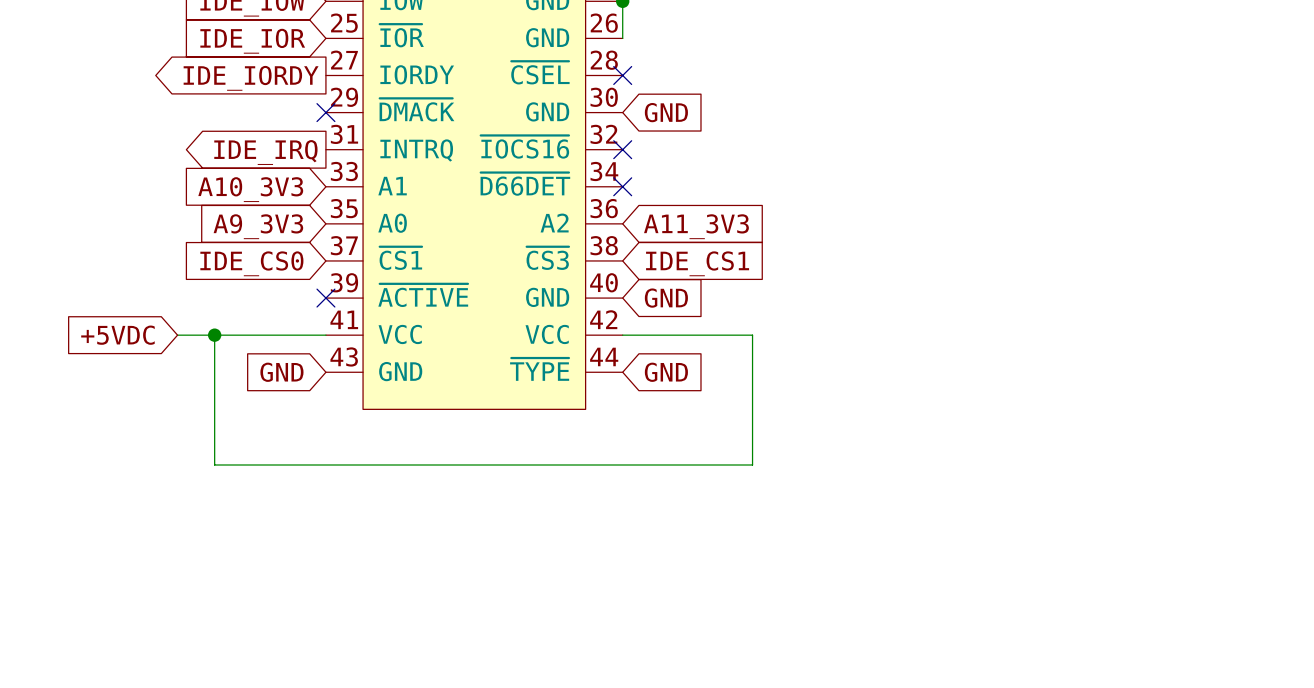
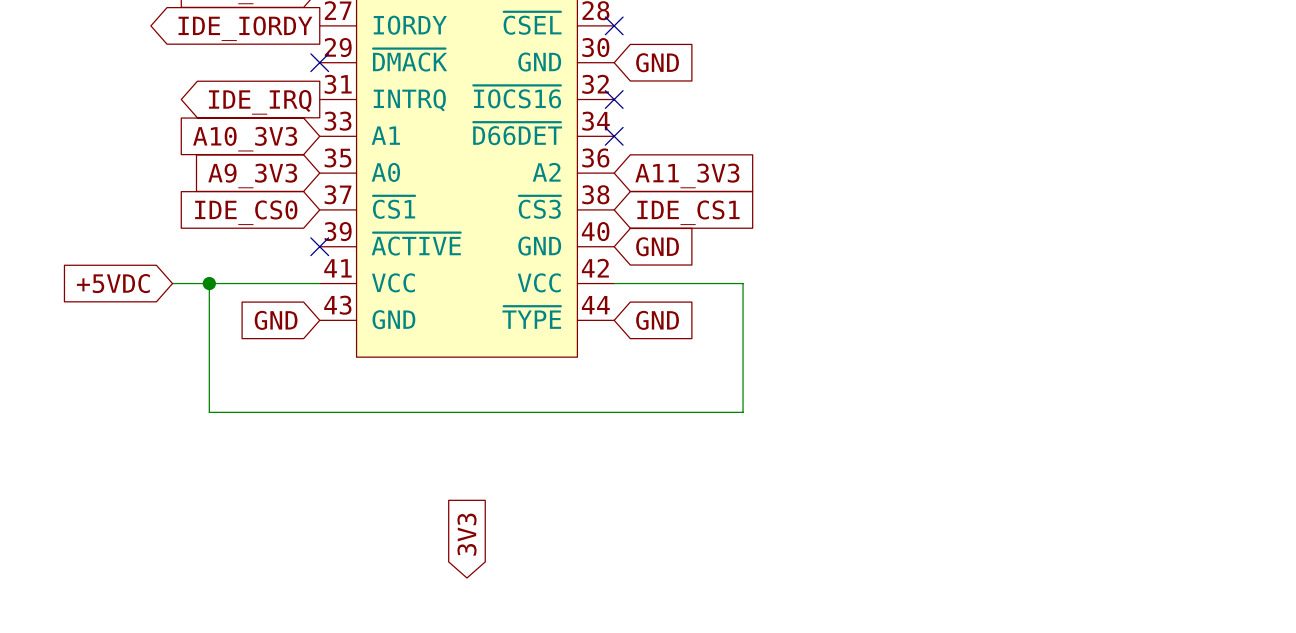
global label: none -> 3V3 (466, 534)

